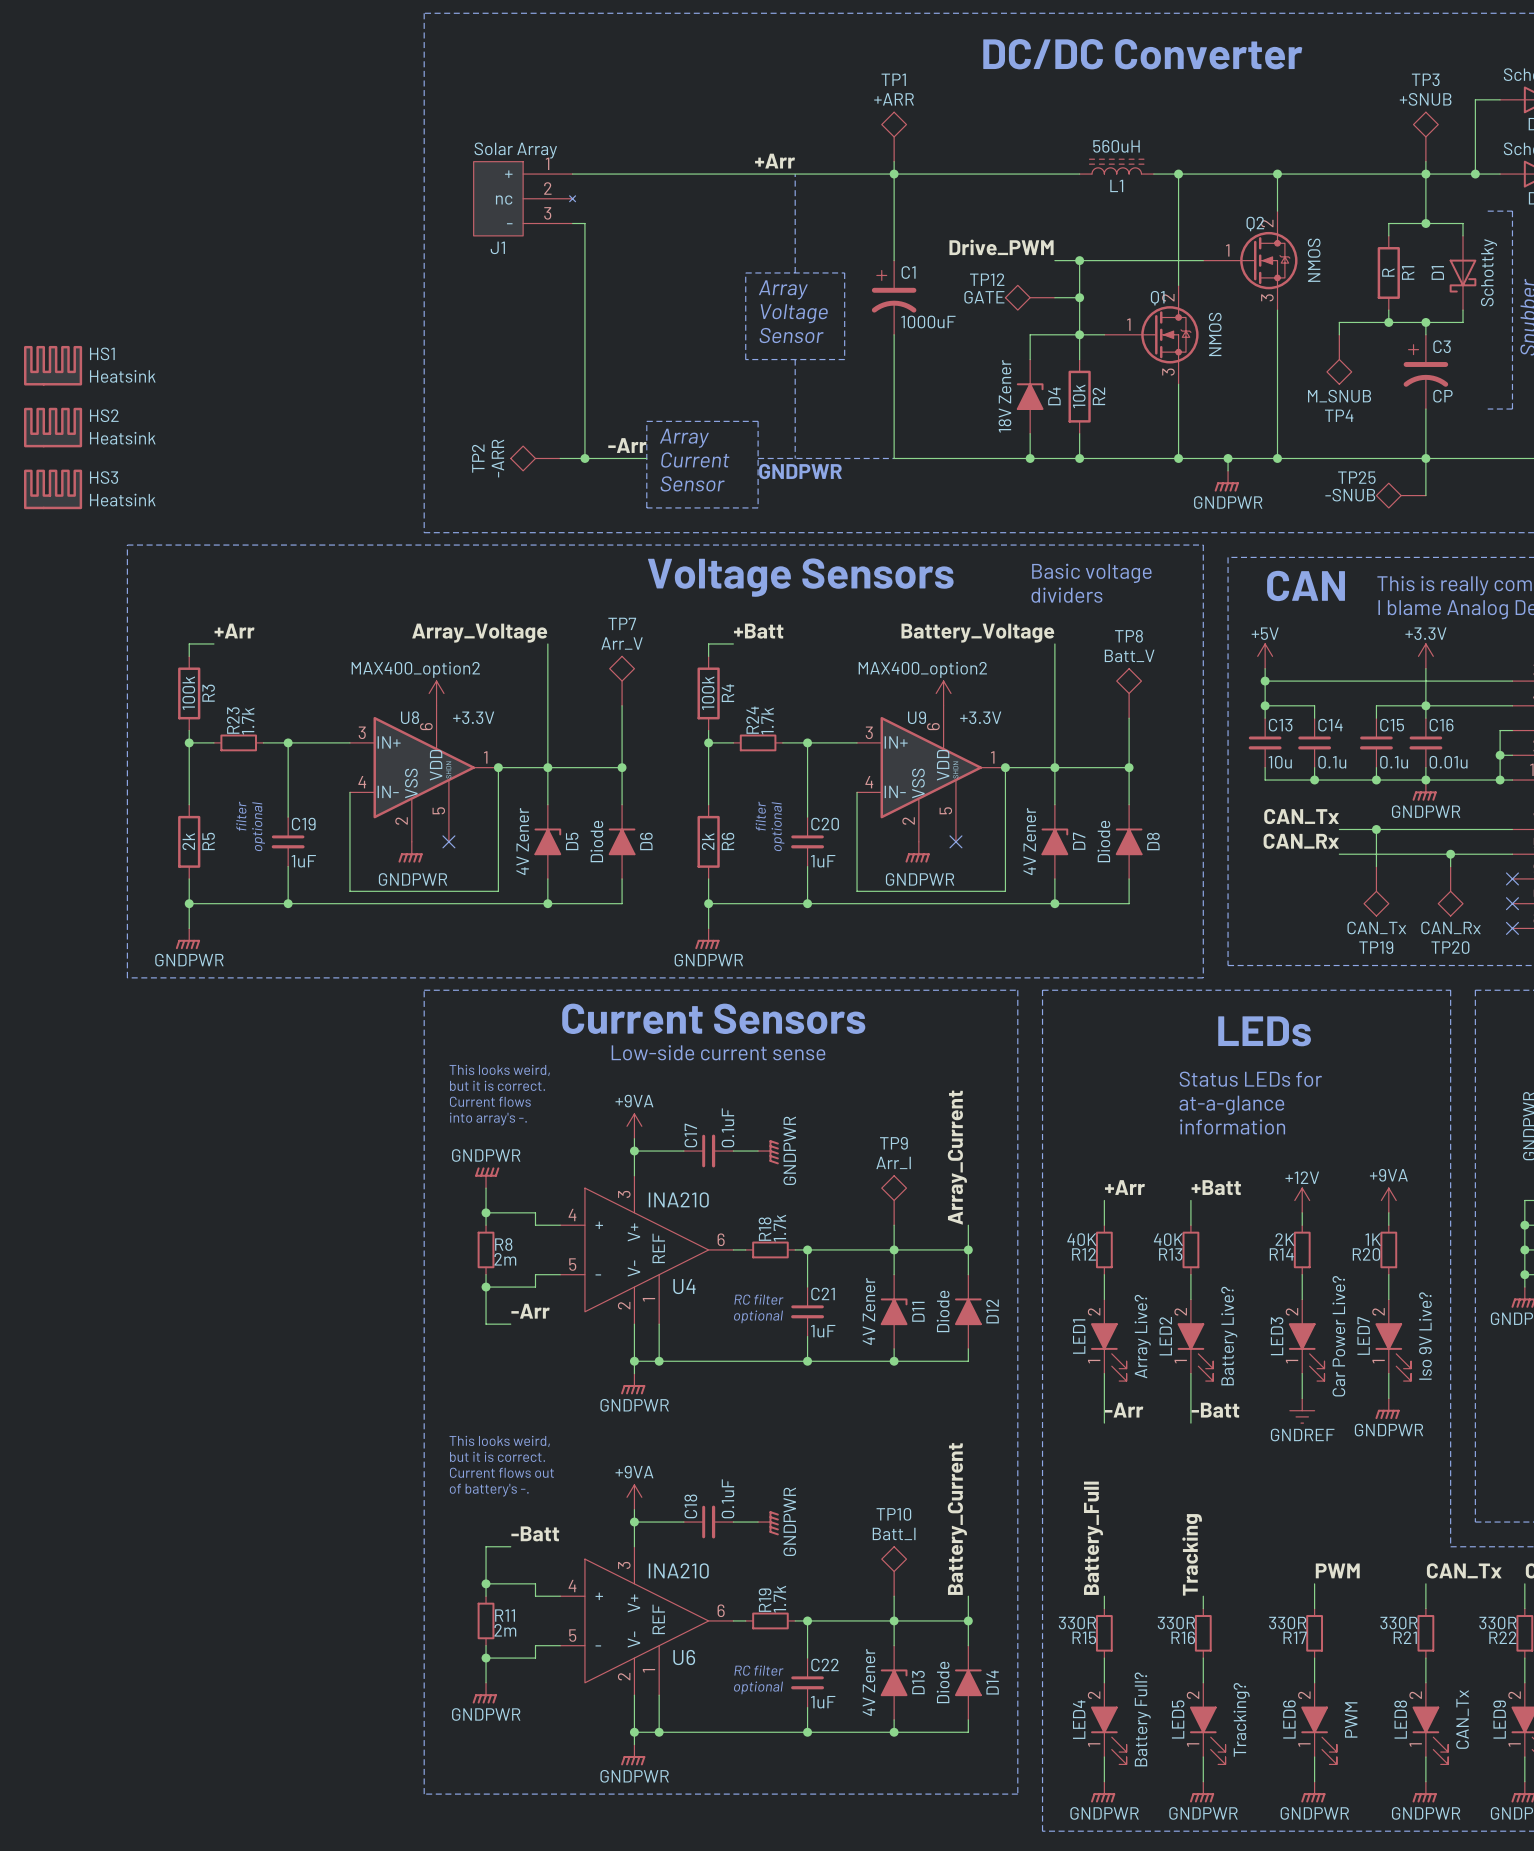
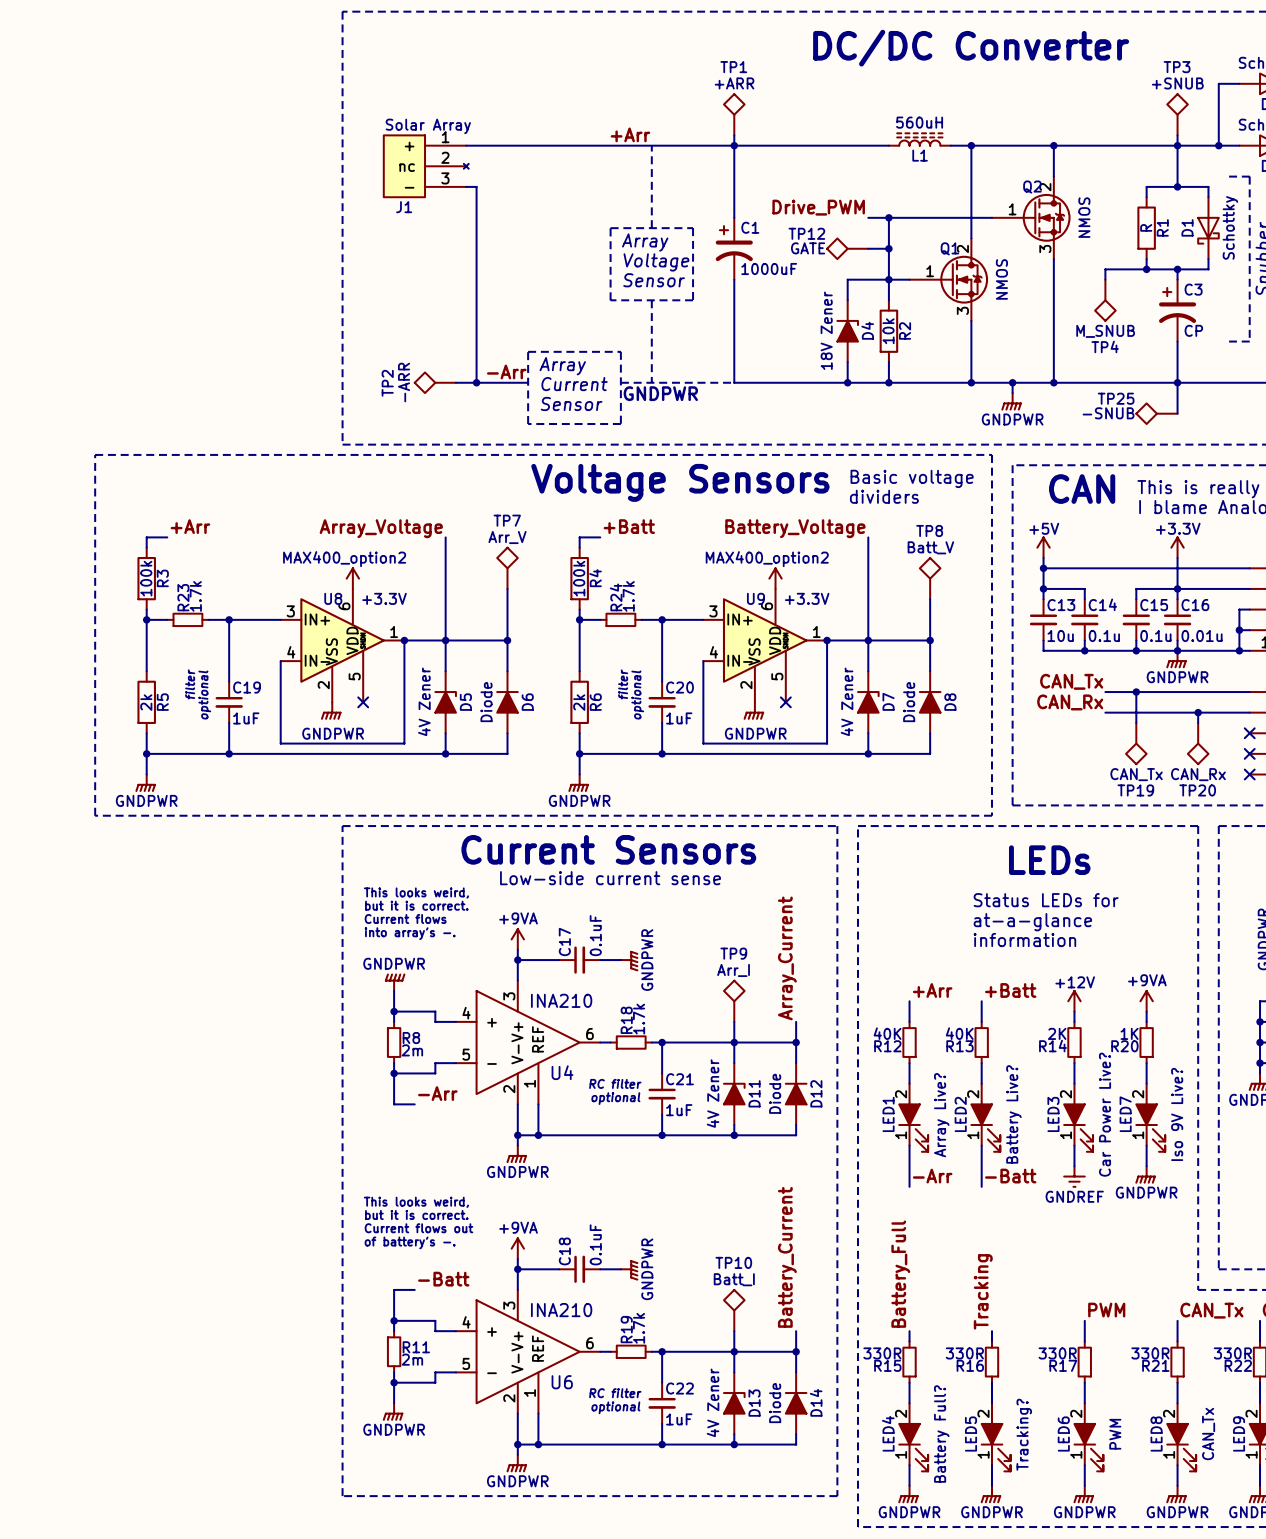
HS1: Heatsink (53, 365) -> none
HS2: Heatsink (53, 427) -> none
HS3: Heatsink (53, 489) -> none

